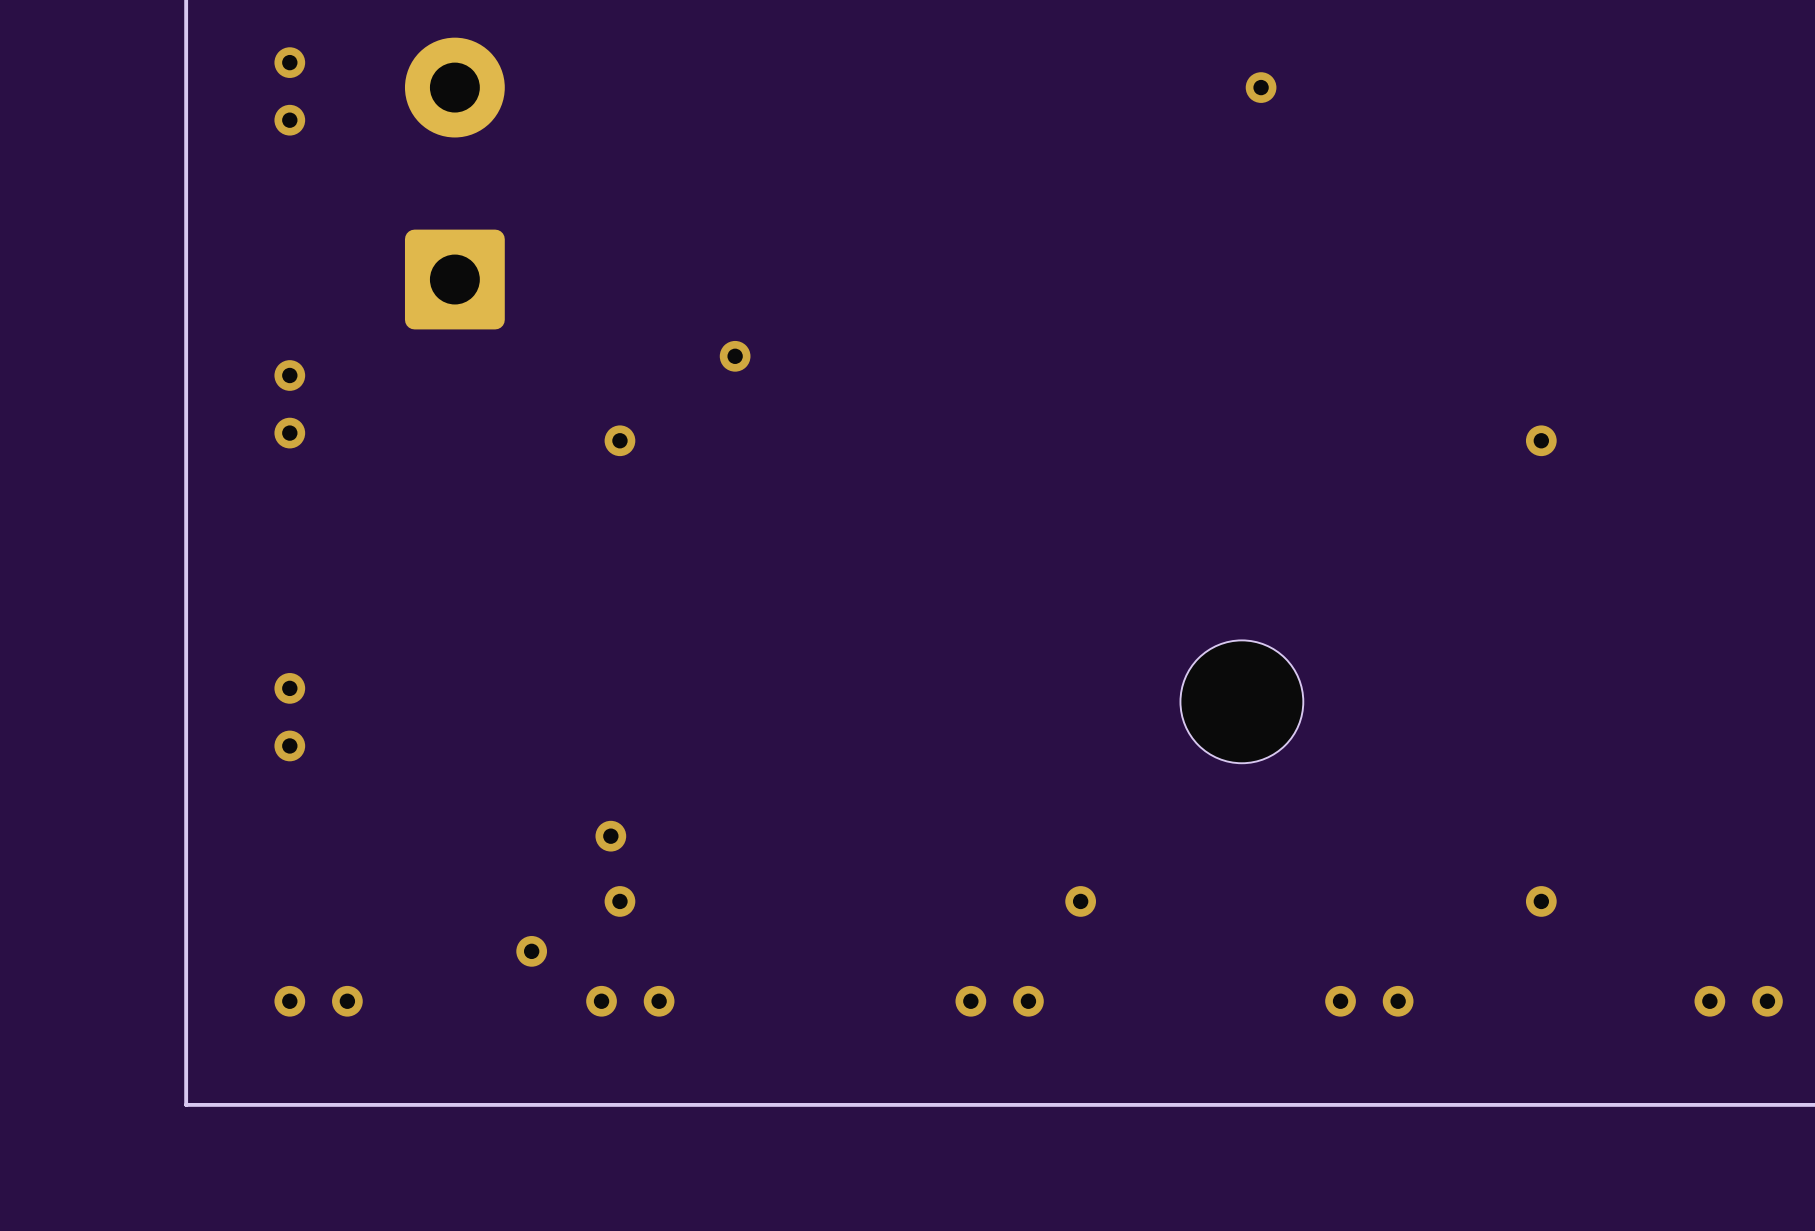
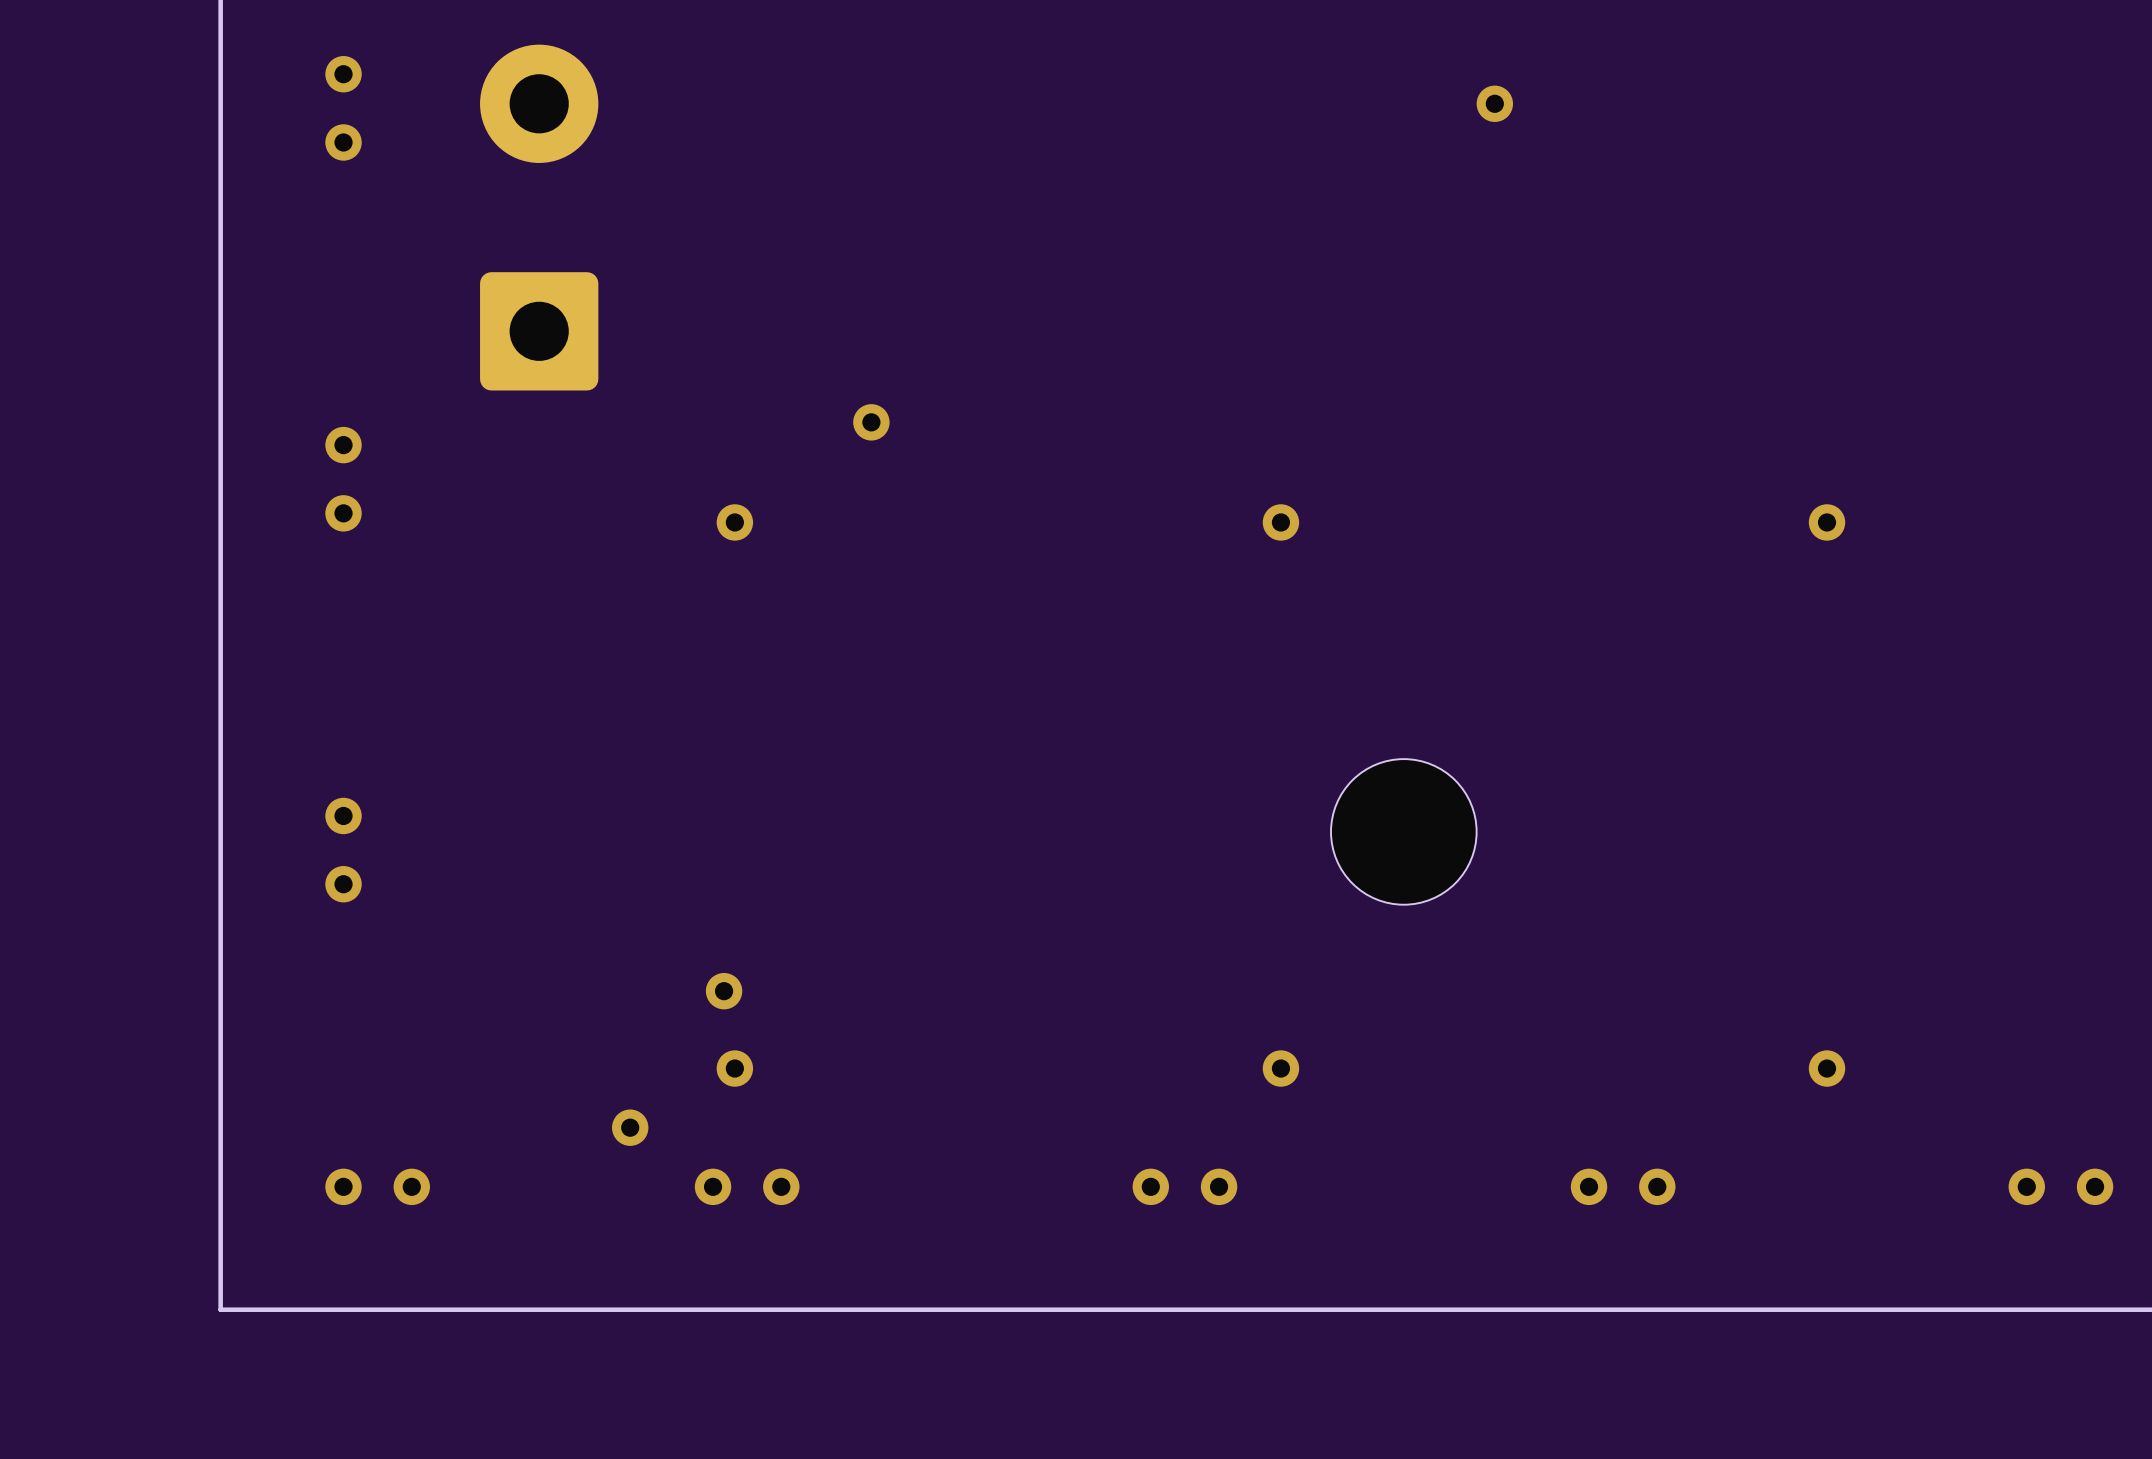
via: none -> (1280, 522)
part position: (1241, 701) -> (1403, 831)

